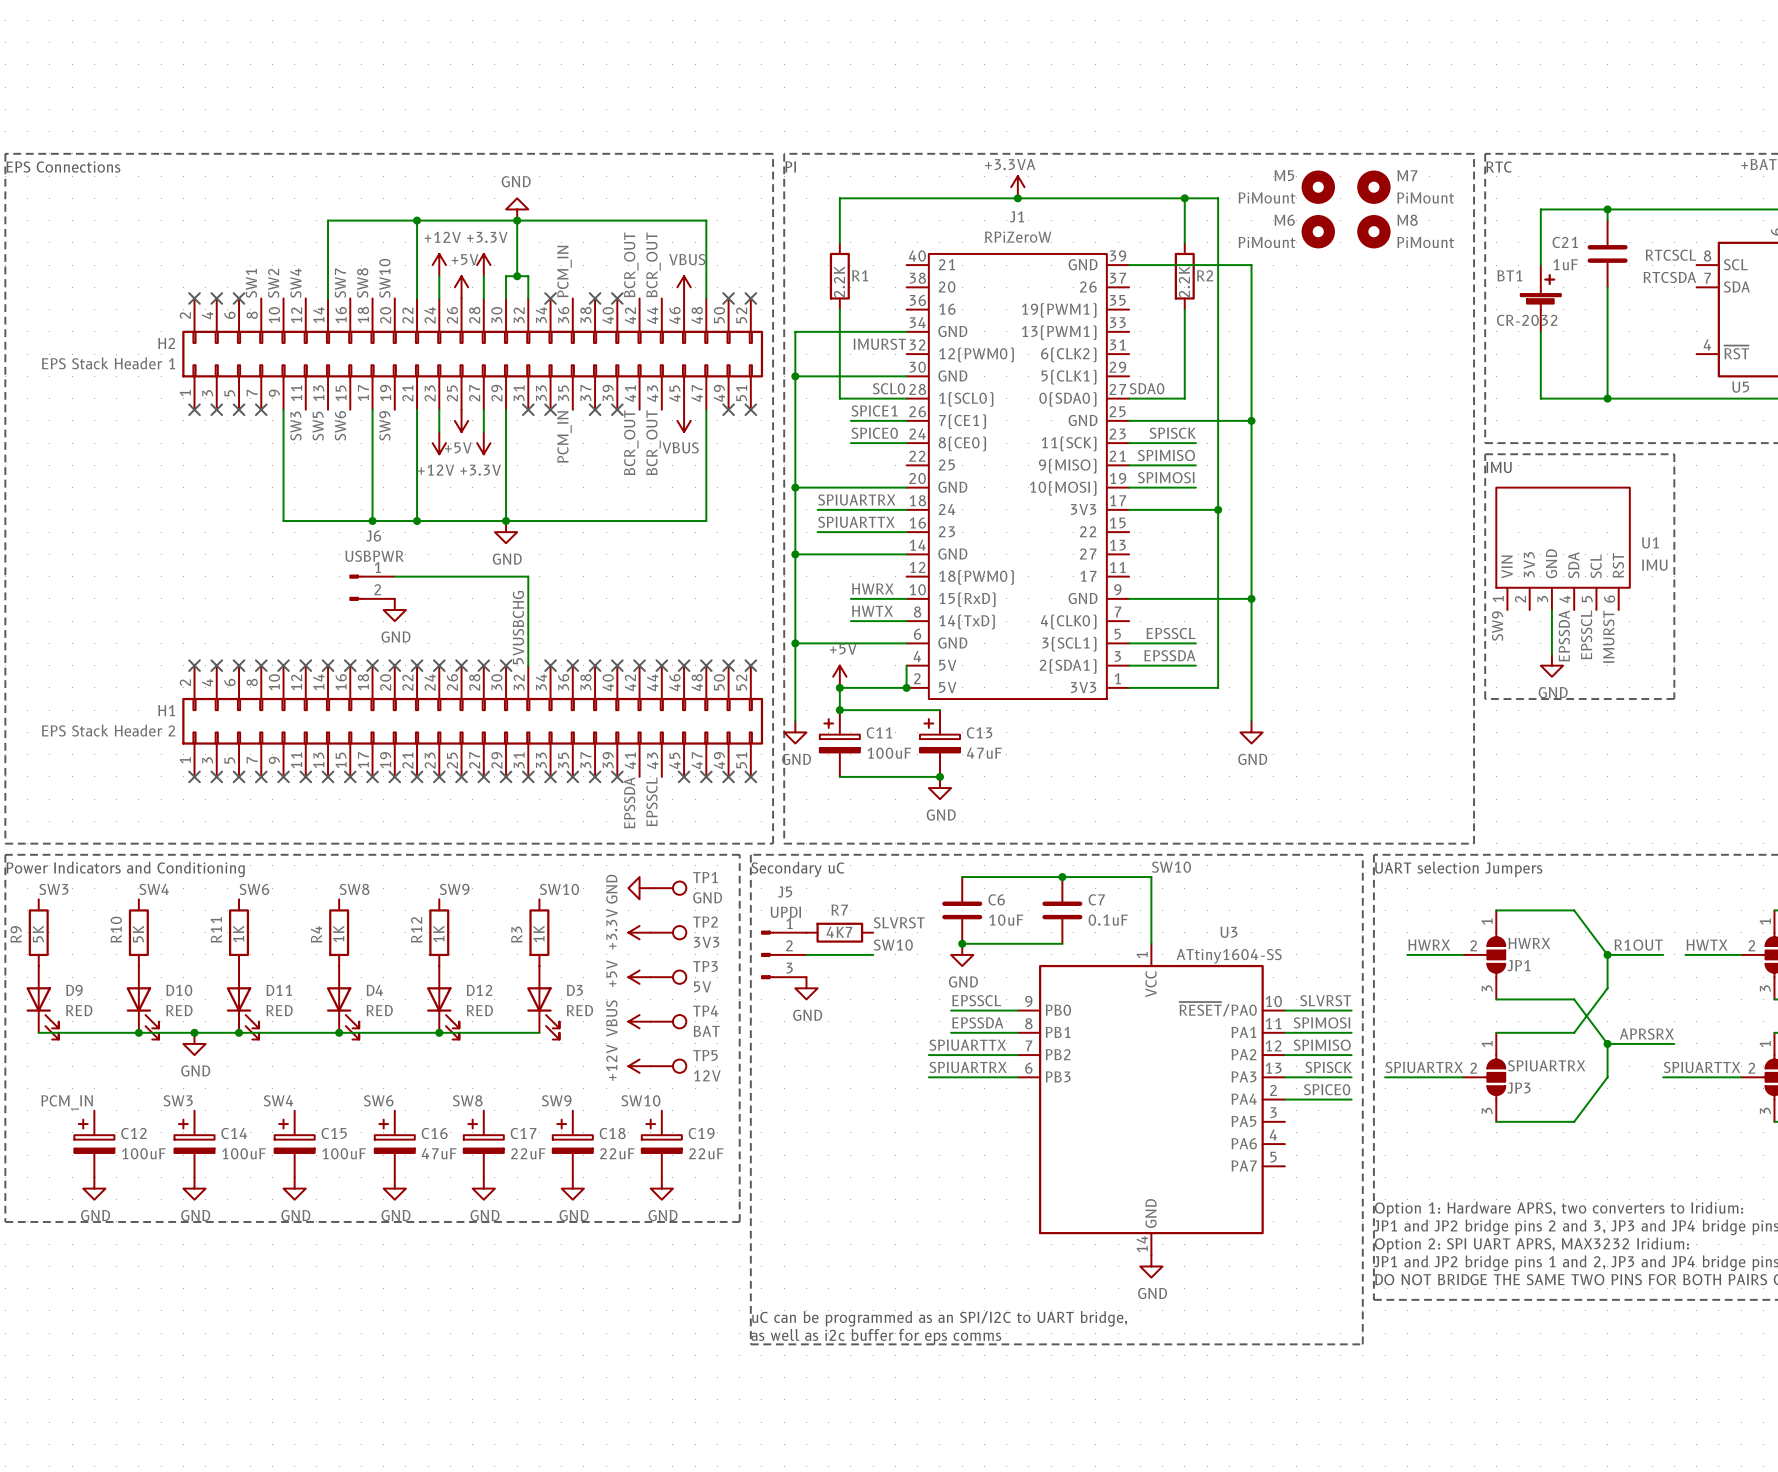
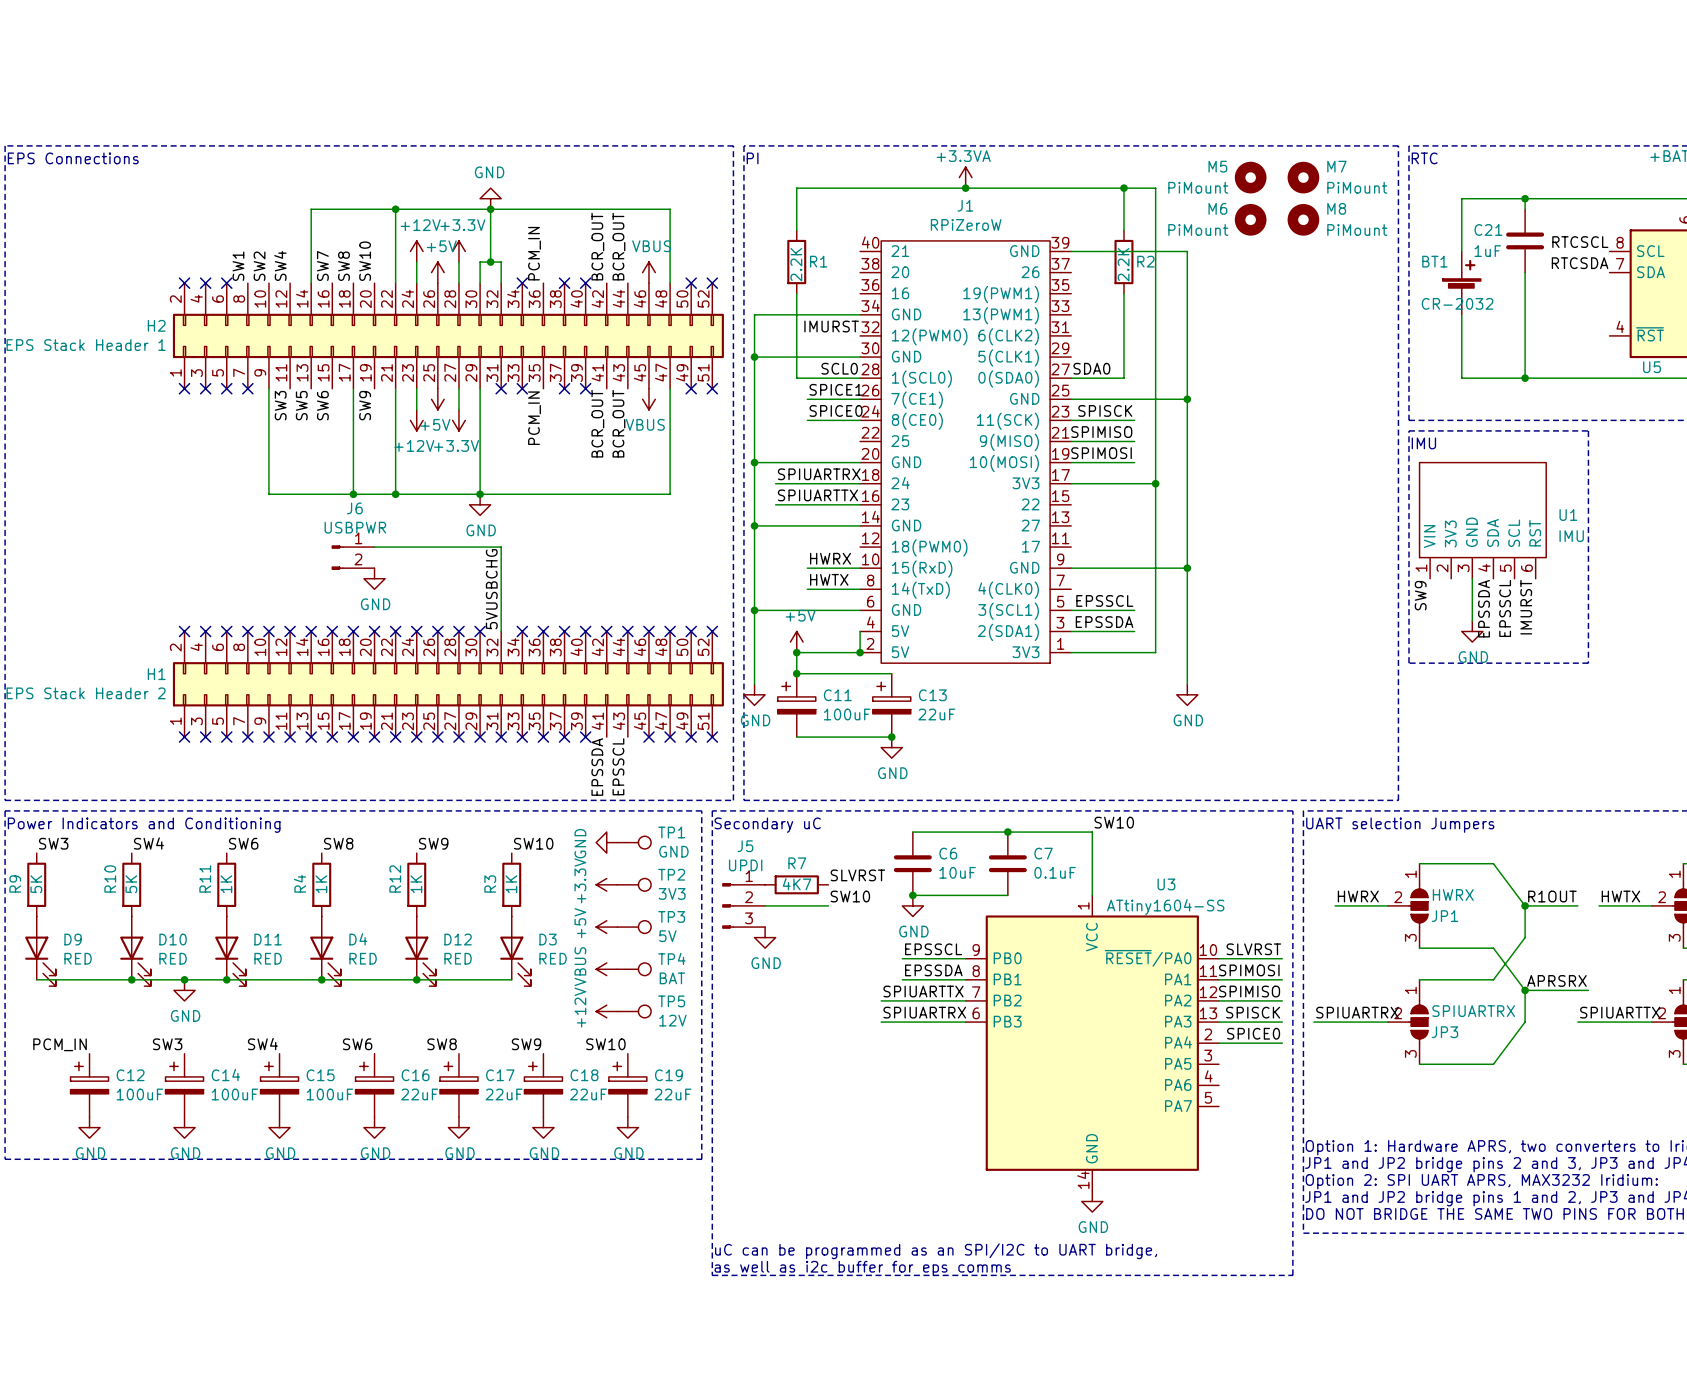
C13 value: 47uF (984, 753) -> 22uF (936, 714)
C16 value: 47uF (439, 1153) -> 22uF (419, 1094)

